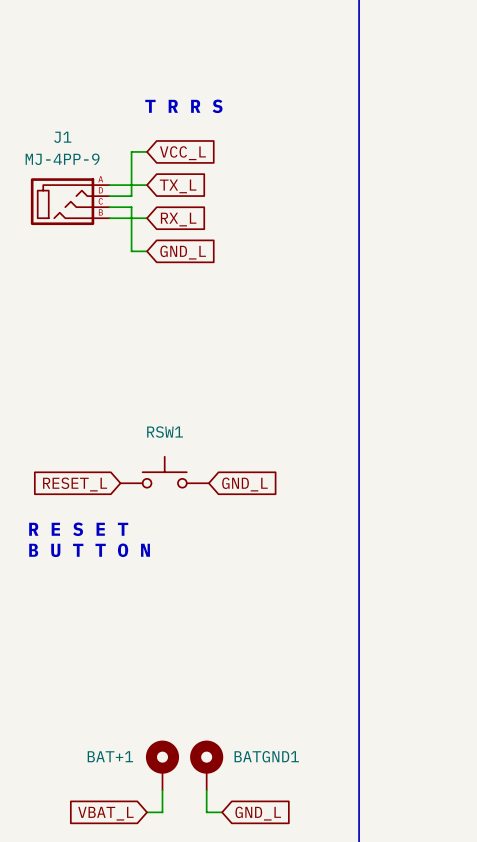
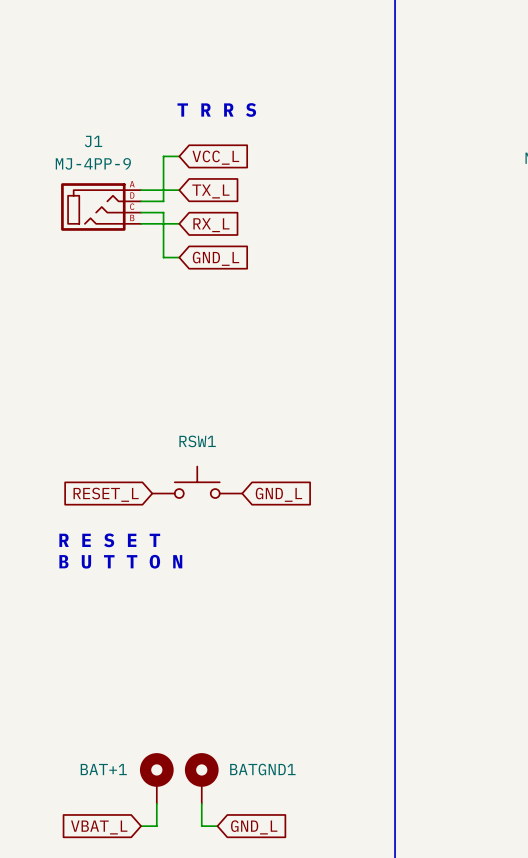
BAT+1 position: (162, 765) -> (156, 778)
BATGND1 position: (206, 765) -> (201, 778)
wire: (162, 790) (162, 812) (147, 812) -> (156, 803) (156, 826) (141, 826)
wire: (206, 790) (206, 812) (222, 812) -> (201, 803) (201, 826) (217, 826)
global label position: VBAT_L (105, 813) -> VBAT_L (99, 827)
global label position: GND_L (258, 813) -> GND_L (254, 827)

